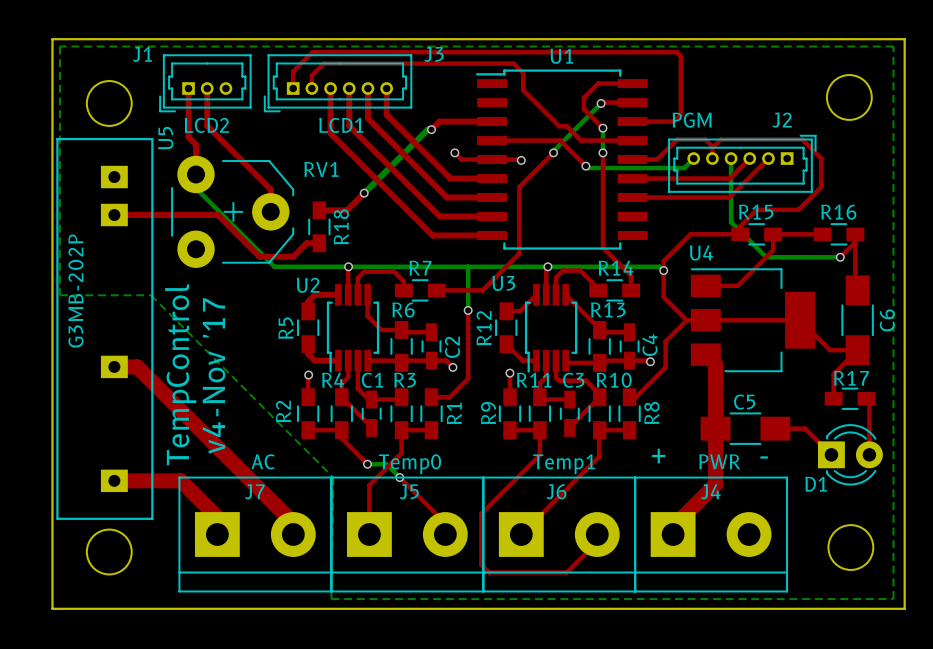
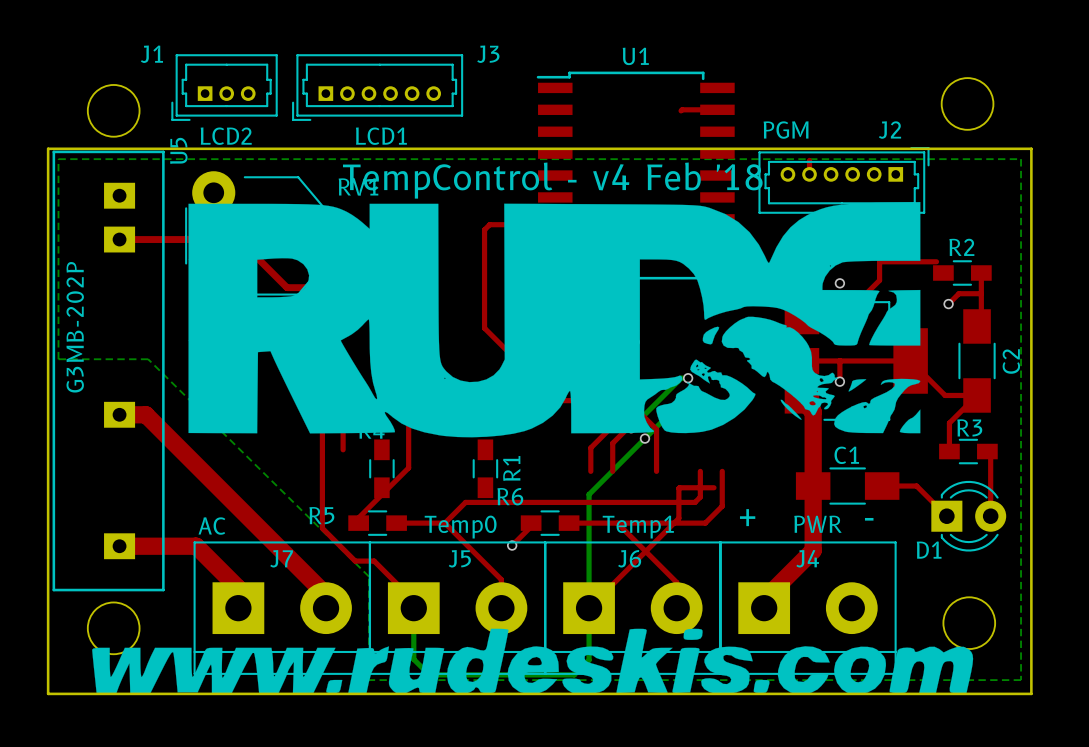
bottom zone outline: (59, 46) (59, 295) (151, 295) (333, 477) (331, 599) (893, 599) (893, 46) (59, 46) -> (58, 159) (58, 359) (148, 359) (368, 576) (368, 680) (1021, 680) (1021, 159) (58, 159)
top track: (632, 83) (598, 83) (583, 97) (583, 109) (602, 128) -> none
top track: (188, 88) (188, 137) (196, 144) (196, 174) -> none
top track: (207, 88) (207, 125) (270, 189) (270, 211) -> none
top track: (293, 88) (293, 71) (312, 52) (677, 52) (680, 56) (680, 114) (674, 121) (632, 121) -> none
top track: (311, 88) (311, 75) (323, 63) (513, 63) (523, 73) (523, 90) (559, 126) (566, 126) (581, 140) (632, 140) -> none
top track: (330, 88) (330, 133) (432, 235) (492, 235) -> none
top track: (349, 88) (349, 125) (439, 216) (492, 216) -> none
top track: (367, 88) (367, 118) (447, 197) (492, 197) -> none
top track: (386, 88) (386, 114) (450, 178) (492, 178) -> none
bottom track: (601, 103) (551, 152) (553, 152) -> none
via: (601, 103) -> none
top track: (492, 121) (439, 121) (431, 129) -> none
bottom track: (602, 128) (602, 152) -> none
via: (602, 128) -> none
bottom track: (431, 129) (427, 129) (364, 193) -> none
via: (431, 129) -> none
board edge: (52, 136) (52, 39) (904, 39) (904, 136) -> (48, 148) (1031, 148)
top track: (492, 140) (560, 140) (585, 166) -> none
top track: (454, 152) (461, 159) (521, 160) -> none
via: (454, 152) -> none
top track: (553, 152) (519, 187) (519, 253) (482, 290) (436, 290) -> none
via: (553, 152) -> none
top track: (602, 152) (602, 247) (631, 275) (631, 290) -> none
via: (602, 152) -> none
bottom track: (693, 158) (684, 168) (587, 168) (585, 166) -> none
bottom track: (731, 158) (731, 222) (766, 257) (840, 257) -> none
top track: (749, 158) (729, 178) (632, 178) -> none
top track: (768, 158) (729, 197) (632, 197) -> none
top track: (632, 159) (657, 159) (677, 139) (705, 139) (712, 146) (720, 139) (802, 139) (821, 158) (821, 187) (798, 209) (756, 209) (740, 226) (740, 234) (690, 234) (663, 261) (663, 297) (686, 320) (665, 341) (665, 367) (635, 397) (629, 397) -> none
via: (521, 160) -> none
text: none -> TempControl - v4 Feb '18 (552, 180)
via: (585, 166) -> none
bottom track: (196, 174) (196, 188) (274, 266) (659, 266) (663, 270) -> none
drawing: none -> [92, 202, 974, 695]
top track: (364, 193) (347, 210) (319, 210) -> none
via: (364, 193) -> none
top track: none -> (525, 243) (525, 230) (519, 224) (489, 224) (484, 229) (484, 328) (557, 400) (627, 400) (656, 429) (656, 471)
R18: (319, 226) -> none
R15: (756, 234) -> none
R16: (838, 234) -> none
top track: (855, 234) (855, 288) -> none
top track: (855, 242) (840, 257) -> none
top track: none -> (981, 273) (981, 322) (977, 326)
via: none -> (839, 283)
via position: (840, 257) -> (948, 304)
top track: none -> (981, 293) (958, 293) (948, 304)
top track: (348, 266) (348, 294) -> none
via: (348, 266) -> none
bottom track: (468, 266) (468, 310) -> none
top track: (547, 266) (546, 268) (546, 294) -> none
via: (547, 266) -> none
via: (663, 270) -> none
top track: (403, 290) (403, 281) (394, 271) (364, 271) (357, 278) (357, 294) -> none
R7: (420, 290) -> none
top track: (598, 290) (580, 270) (563, 270) (555, 277) (555, 294) -> none
R14: (614, 290) -> none
top track: (338, 294) (314, 294) (308, 301) (308, 311) -> none
top track: (367, 294) (367, 316) (381, 329) (431, 332) -> none
top track: (536, 294) (520, 311) (506, 311) -> none
top track: (565, 294) (601, 332) (629, 332) -> none
R6 name position: R6 (403, 309) -> R6 (510, 496)
top track: (468, 310) (468, 378) (449, 397) (431, 397) -> none
via: (468, 310) -> none
top track: none -> (408, 359) (408, 467) (358, 517) (358, 523)
top track: none -> (839, 360) (839, 381)
C6 name: C6 (887, 320) -> C2 (1011, 361)
R5 rotation: 0° (308, 327) -> 90° clockwise (377, 523)
R5 position: (308, 327) -> (377, 523)
R12: (506, 327) -> none
U2: (353, 328) -> none
U3: (551, 328) -> none
bottom track: none -> (688, 378) (681, 378) (631, 428)
via: none -> (688, 378)
via: none -> (839, 381)
top track: (308, 344) (308, 353) (314, 360) (338, 360) -> none
top track: (506, 344) (522, 360) (536, 360) -> none
R6 rotation: 0° (401, 346) -> 90° clockwise (550, 523)
R6 position: (401, 346) -> (550, 523)
C2: (431, 346) -> none
R13: (599, 346) -> none
C4: (629, 346) -> none
top track: (348, 360) (348, 377) (341, 383) (341, 397) -> none
top track: (357, 360) (357, 388) (368, 399) (399, 399) (401, 397) -> none
top track: (367, 360) (399, 360) (401, 362) (403, 360) (446, 360) (452, 367) -> none
top track: (546, 360) (546, 376) (539, 383) (539, 397) (542, 399) (569, 399) -> none
top track: (555, 360) (555, 377) (559, 380) (585, 380) (599, 394) (599, 397) (569, 427) -> none
top track: (565, 360) (567, 362) (599, 362) (601, 360) (650, 361) -> none
via: (650, 361) -> none
bottom track: none -> (689, 410) (672, 410) (589, 494) (589, 660) (574, 674) (429, 674) (413, 659) (413, 608)
via: (452, 367) -> none
top track: none -> (619, 419) (590, 447) (590, 471)
top track: (509, 373) (509, 397) -> none
via: (509, 373) -> none
text: TempControl (180, 374) -> none
text: v4-Nov '17 (213, 375) -> none
via: (308, 375) -> none
top track: none -> (629, 426) (612, 443) (612, 471)
R17 name: R17 (851, 378) -> R3 (969, 427)
via: none -> (644, 438)
top track: (341, 397) (371, 427) -> none
C5 name: C5 (744, 402) -> C1 (846, 455)
R2 rotation: 0° (308, 413) -> 90° clockwise (962, 273)
R2 position: (308, 413) -> (962, 273)
C1: (371, 413) -> none
R3: (401, 413) -> none
R9: (509, 413) -> none
R11: (539, 413) -> none
C3: (569, 413) -> none
R10: (599, 413) -> none
R8: (629, 413) -> none
top track: none -> (700, 471) (700, 497) (695, 502) (465, 502) (444, 523)
top track: none -> (722, 471) (722, 506) (705, 523) (569, 523)
top track: (308, 430) (341, 430) (341, 438) (367, 464) -> none
top track: (431, 430) (401, 430) (401, 452) (369, 485) (369, 528) -> (374, 243) (374, 279) (322, 331) (322, 528) (355, 561) (374, 561) (413, 600)
top track: (509, 430) (539, 430) (539, 455) (481, 513) (481, 564) (489, 572) (566, 572) (597, 542) -> none
top track: none -> (396, 523) (444, 523)
top track: none -> (531, 523) (531, 526) (512, 545)
top track: none -> (617, 523) (676, 582) (676, 608)
J7 value position: AC (263, 461) -> AC (211, 526)
bottom track: (367, 464) (386, 464) (399, 477) -> none
via: (367, 464) -> none
top track: (399, 477) (445, 523) -> (444, 523) (501, 579) (501, 595)
via: (399, 477) -> none
via: none -> (512, 545)

